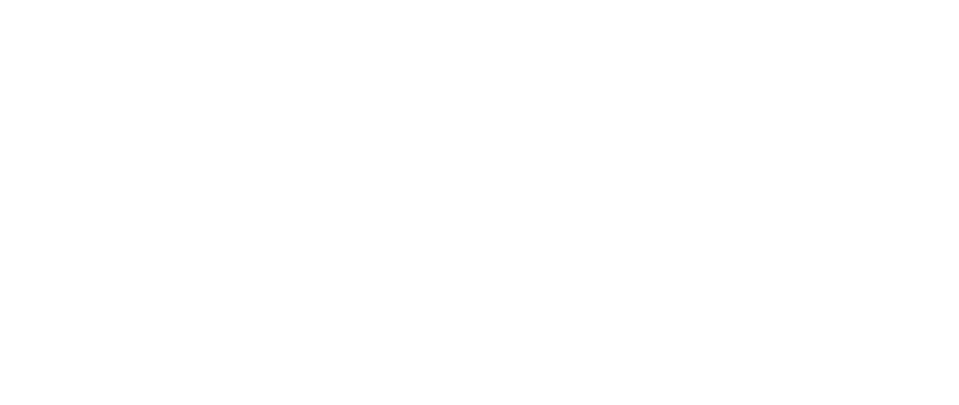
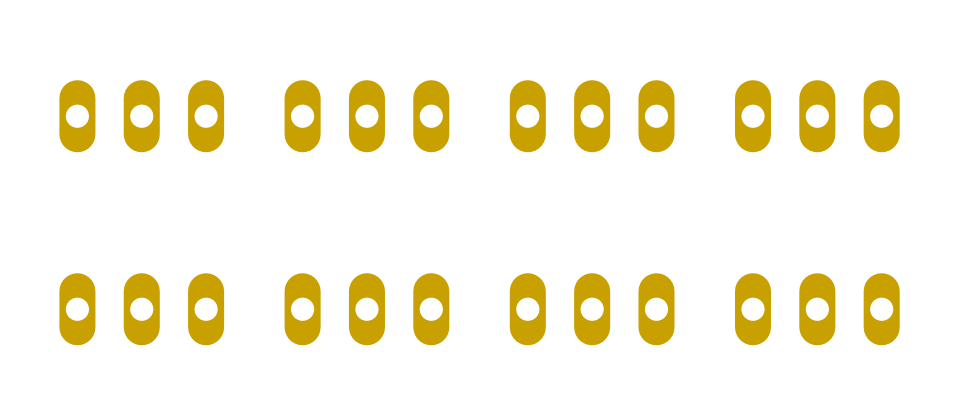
part: none -> (141, 116)
part: none -> (366, 116)
part: none -> (592, 116)
part: none -> (817, 116)
part: none -> (141, 309)
part: none -> (366, 309)
part: none -> (592, 309)
part: none -> (817, 309)

